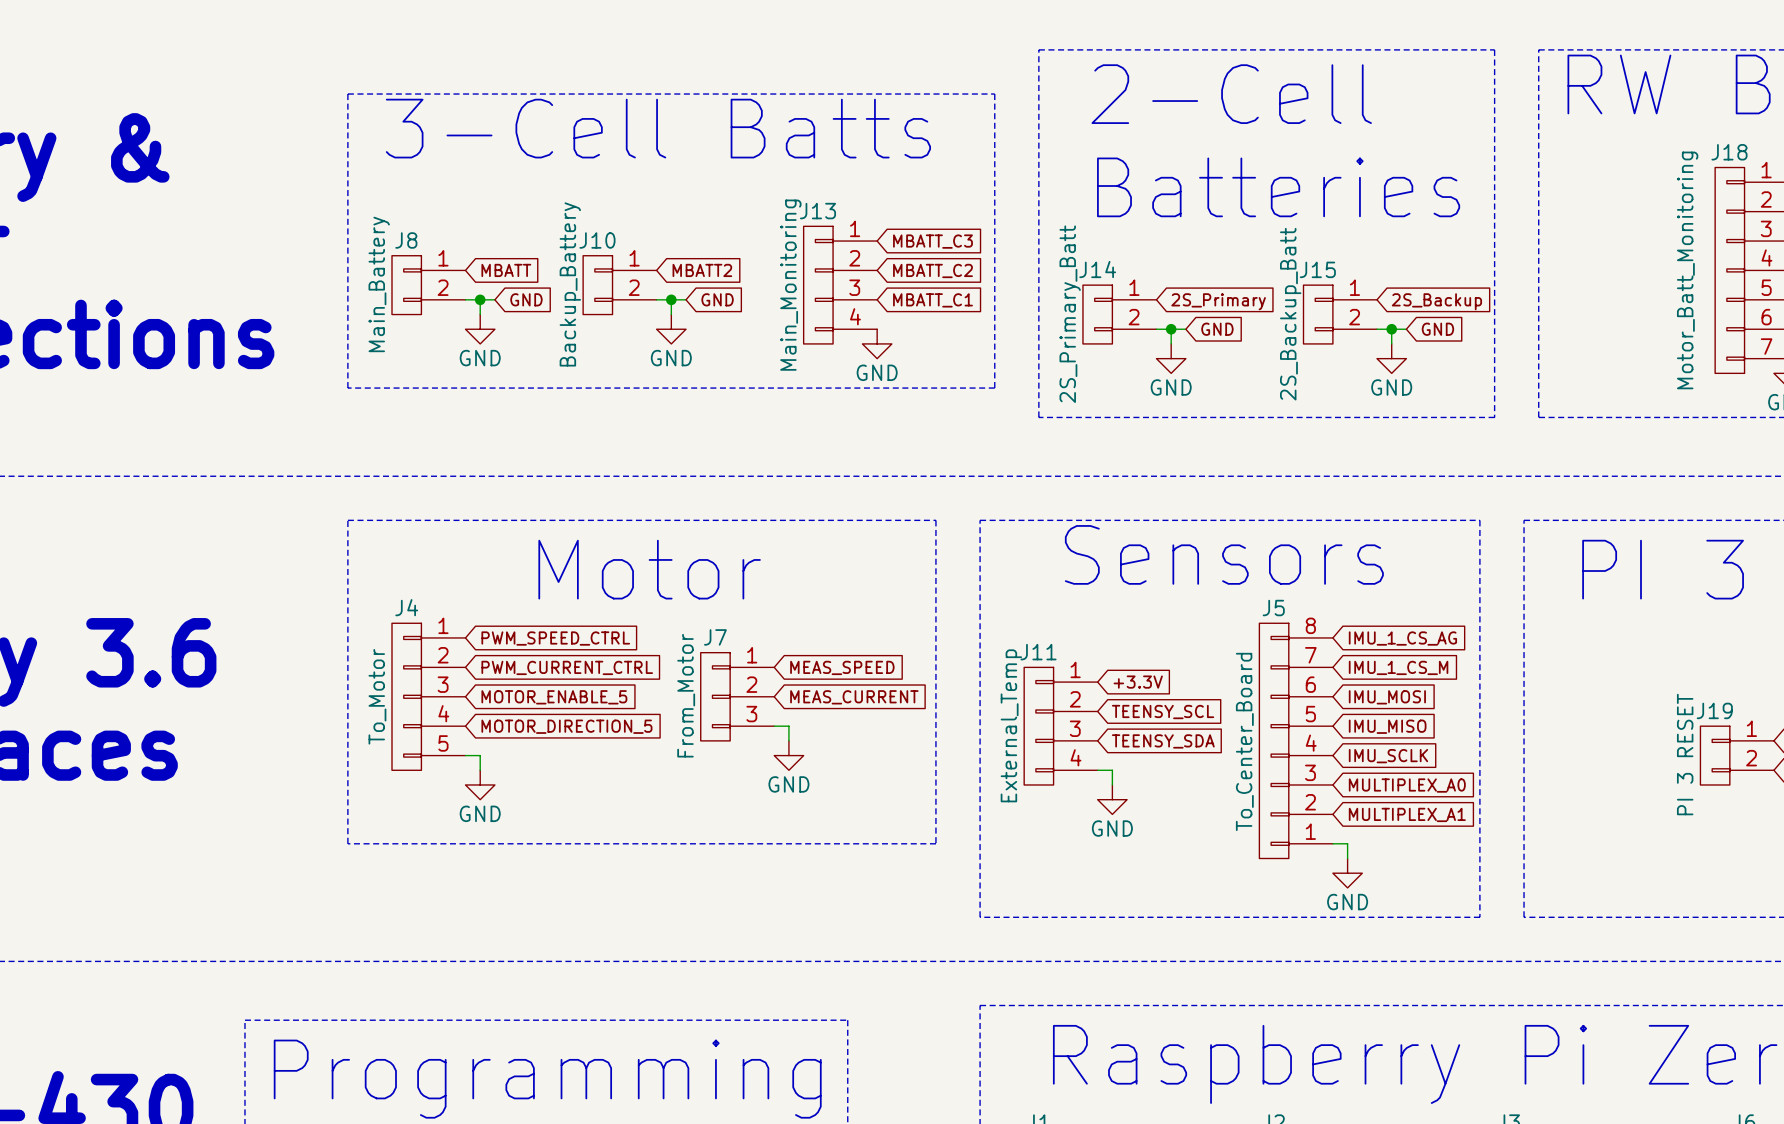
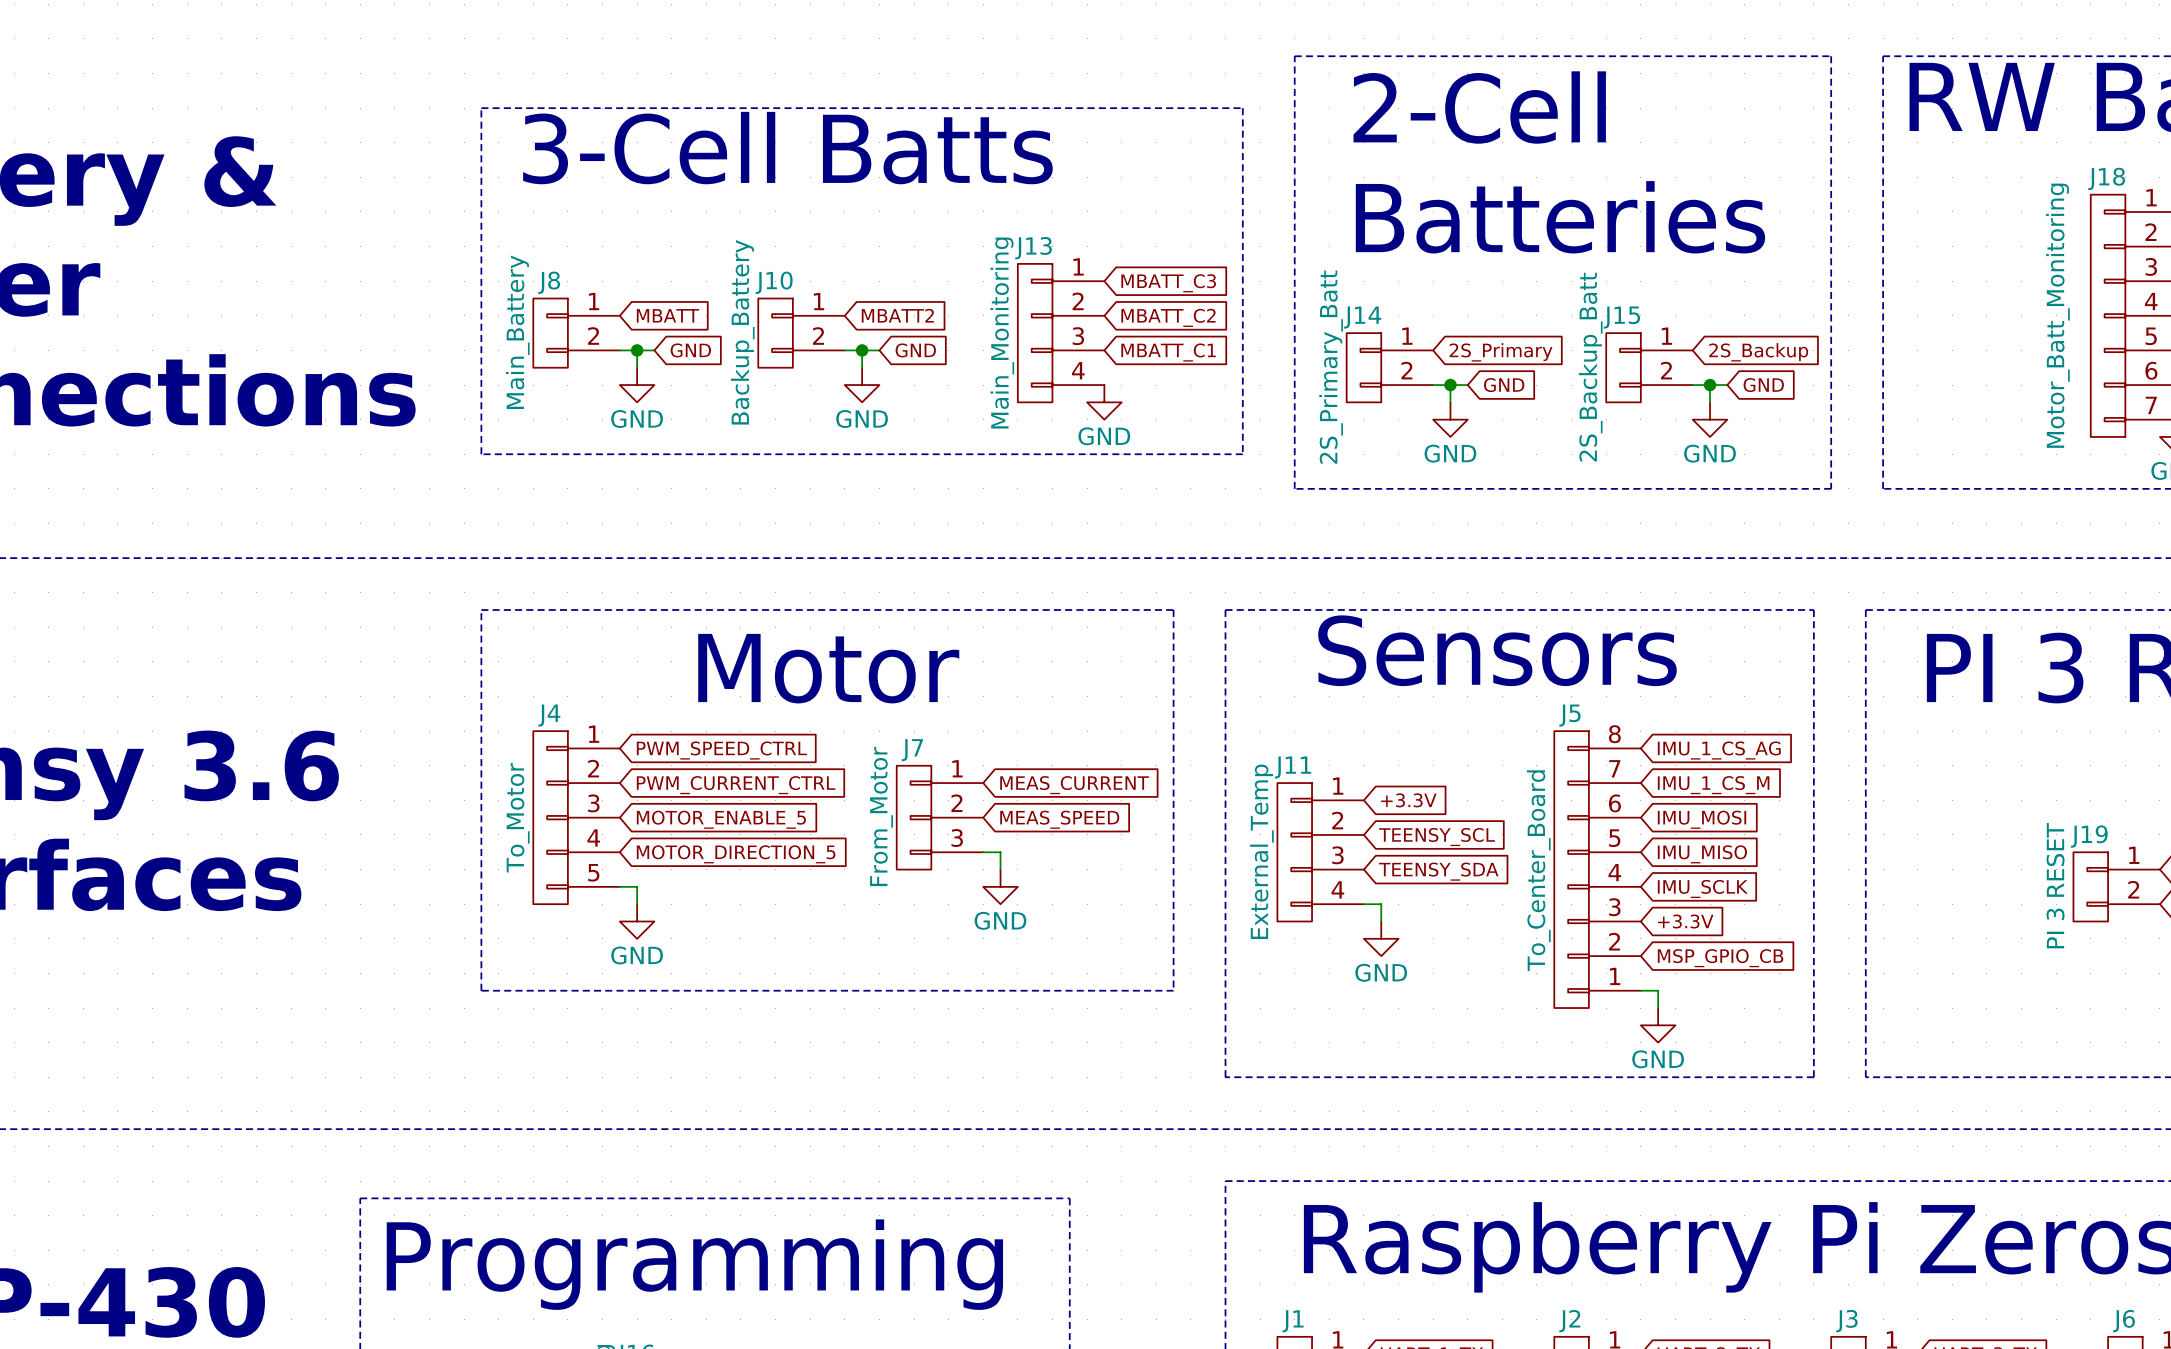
global label: MEAS_SPEED (842, 667) -> MEAS_CURRENT (1074, 785)
global label: MEAS_CURRENT (854, 697) -> MEAS_SPEED (1059, 819)
global label: MULTIPLEX_A0 (1407, 785) -> +3.3V (1685, 921)
global label: MULTIPLEX_A1 (1407, 814) -> MSP_GPIO_CB (1720, 958)

